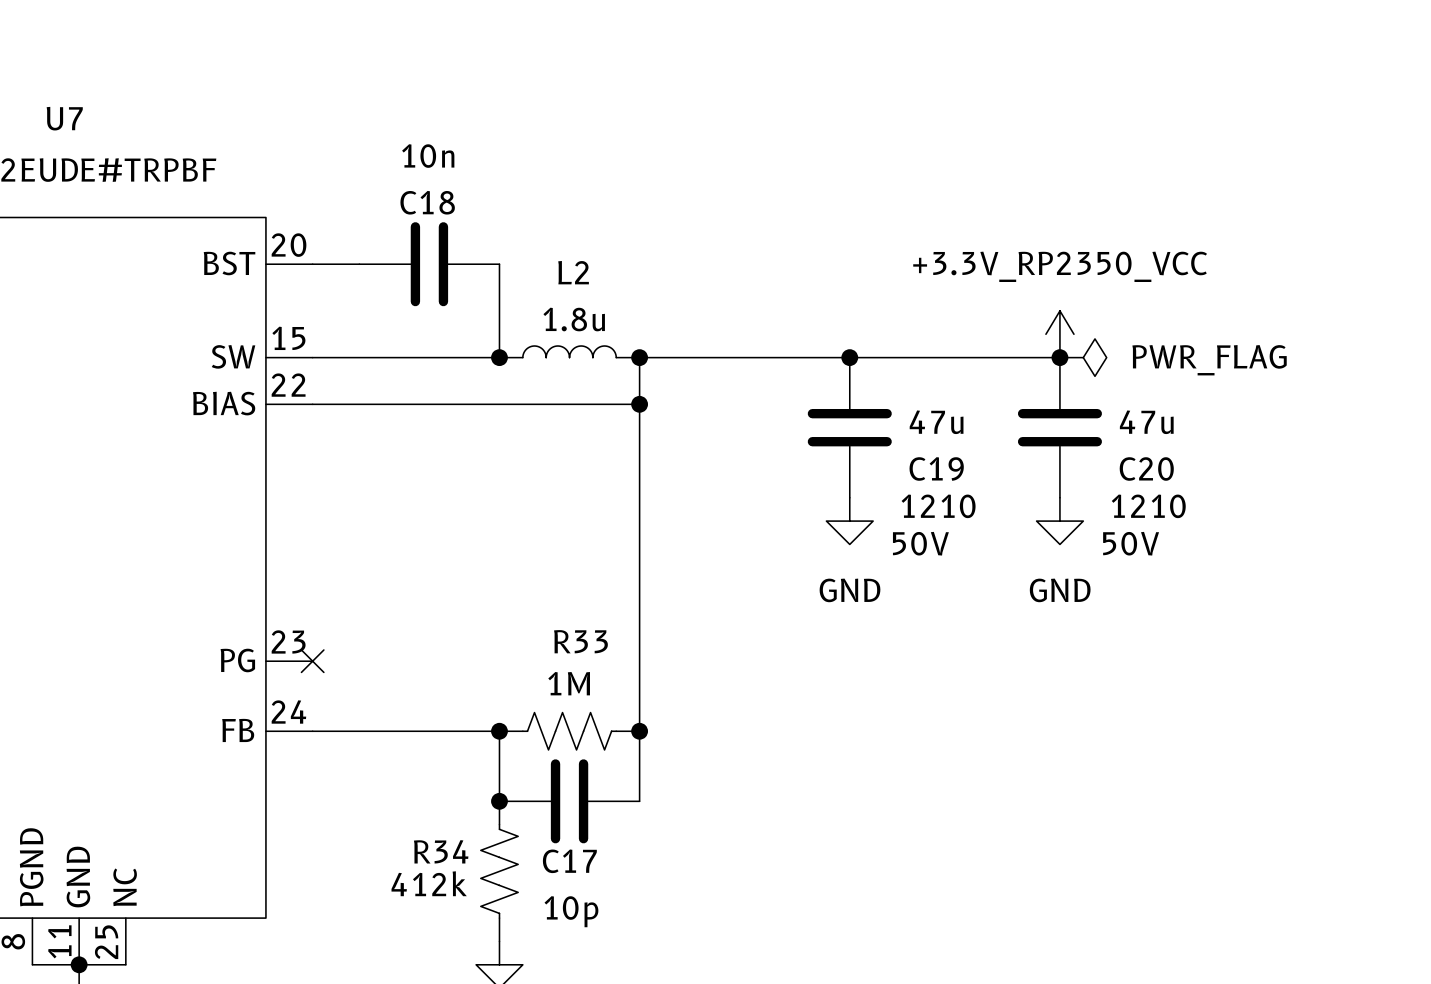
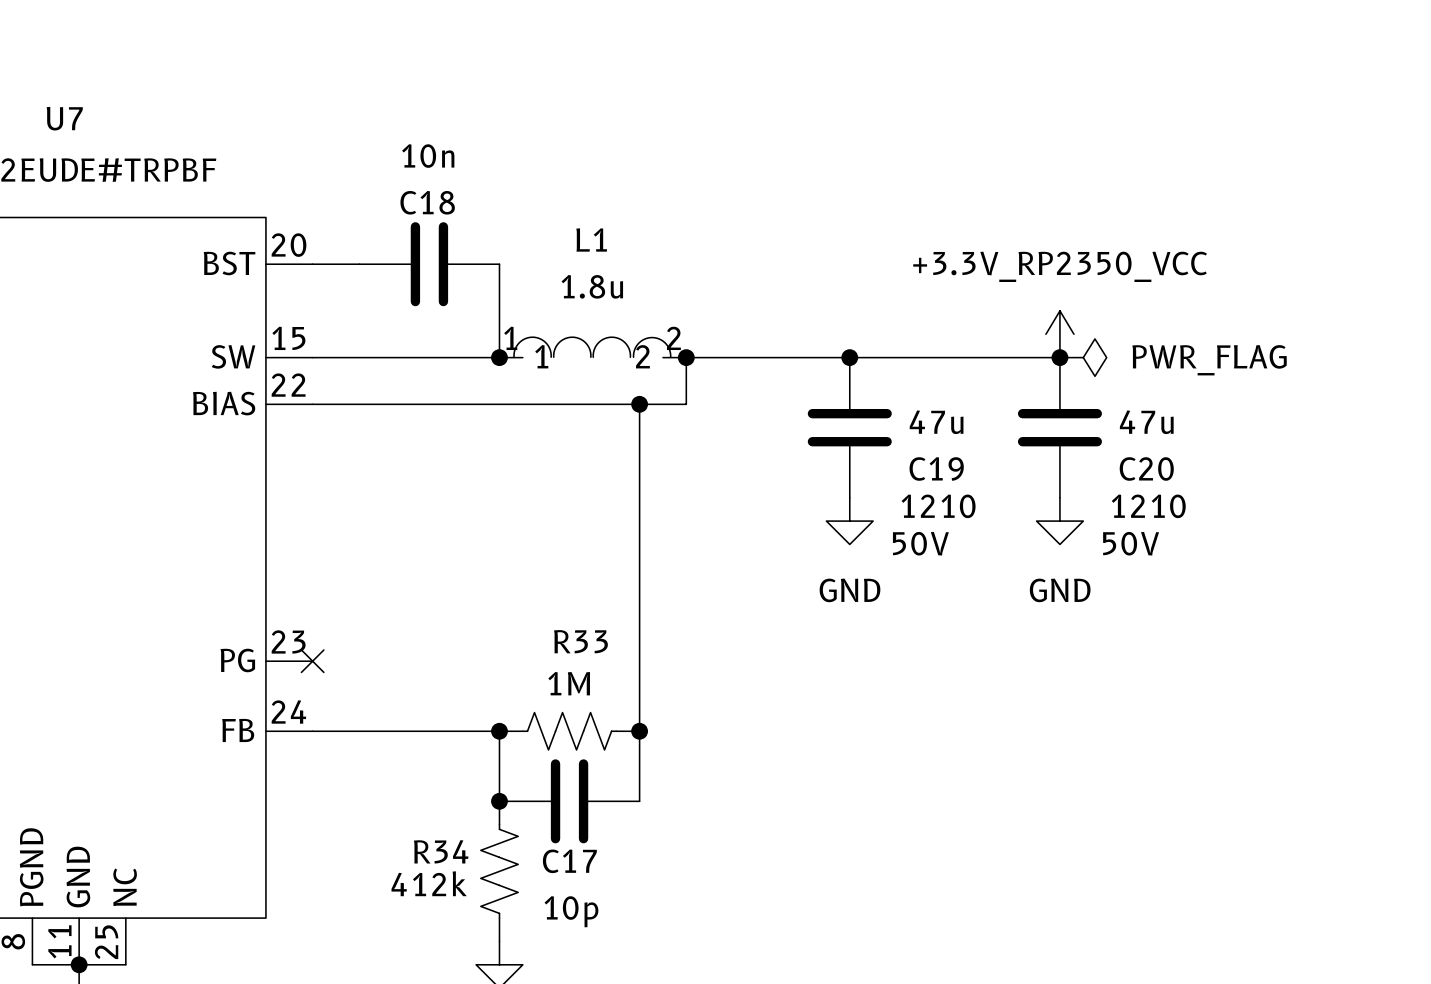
L1: none -> 1.8u (592, 347)
L2: 1.8u (569, 351) -> none
junction position: (639, 357) -> (686, 357)
wire: (686, 357) (639, 357) (639, 404) -> (686, 357) (686, 404) (639, 404)

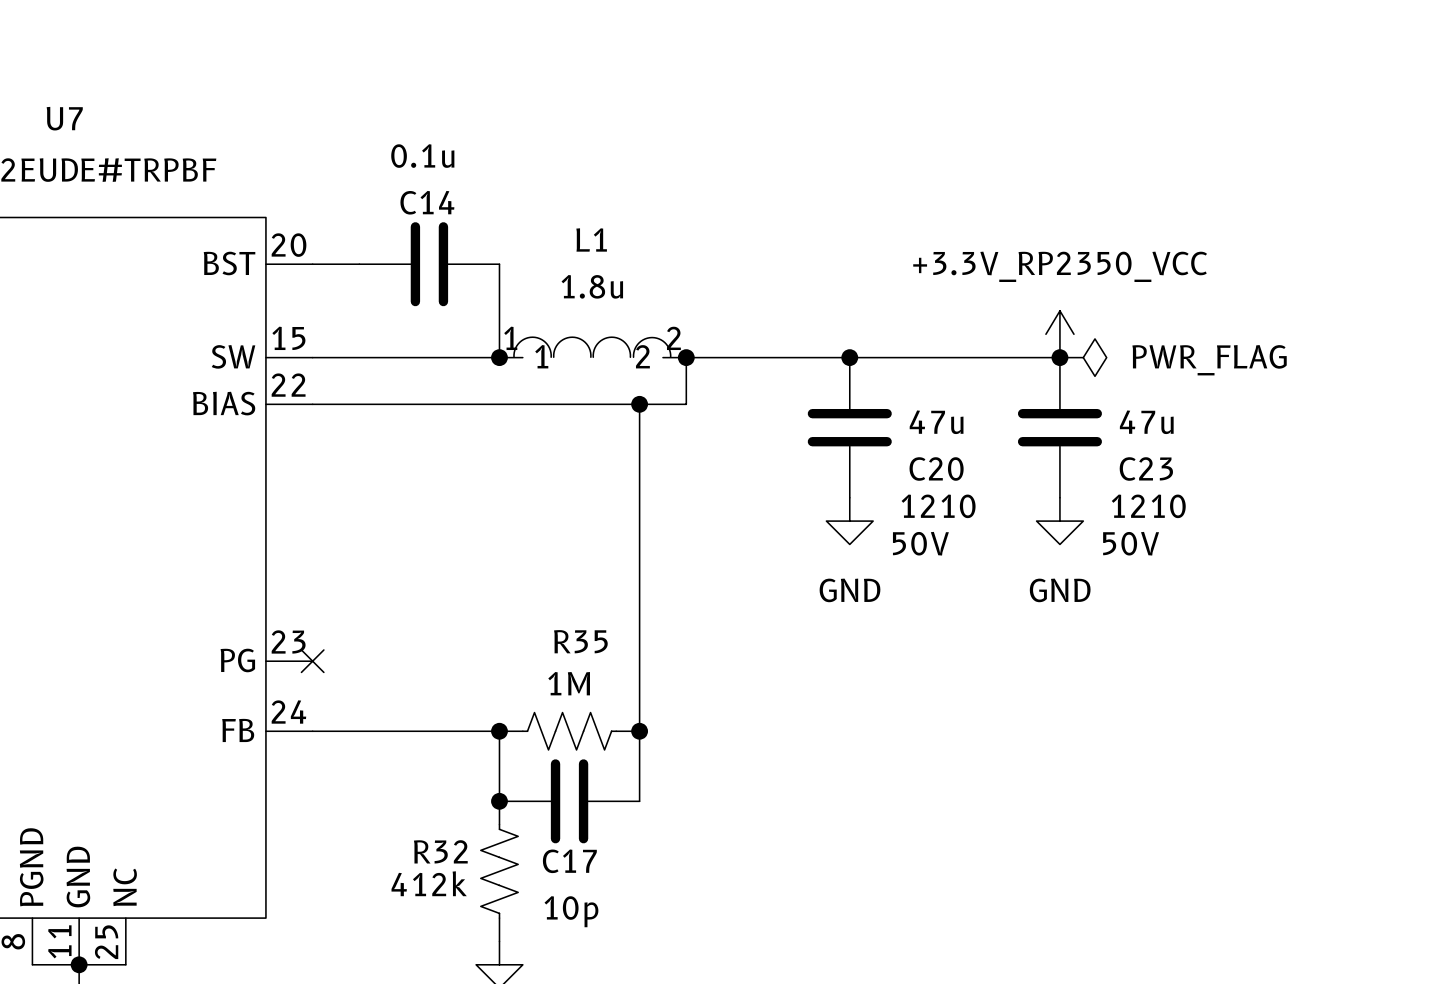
C18 value: 10n (428, 156) -> 0.1u (422, 156)
C18 name: C18 (427, 202) -> C14 (427, 202)
C19 name: C19 (936, 468) -> C20 (936, 468)
C20 name: C20 (1146, 468) -> C23 (1146, 468)
R33 name: R33 (580, 641) -> R35 (580, 641)
R34 name: R34 (441, 851) -> R32 (440, 851)

